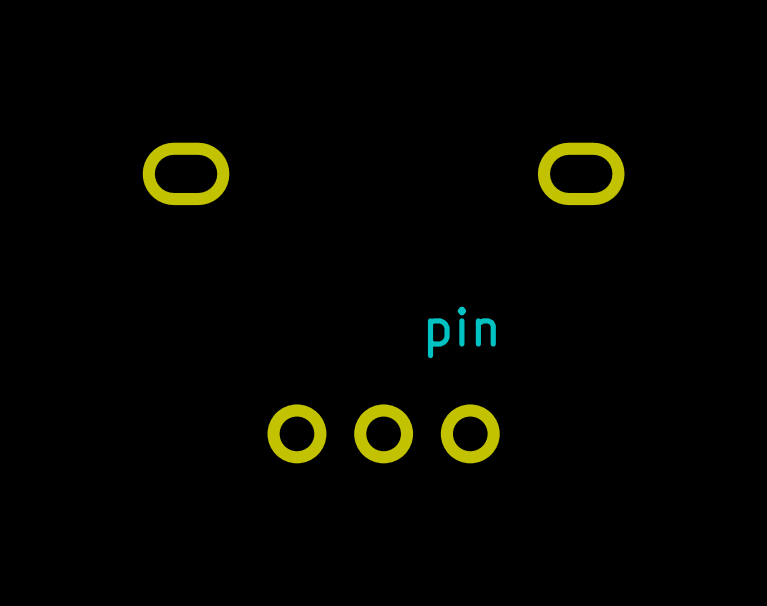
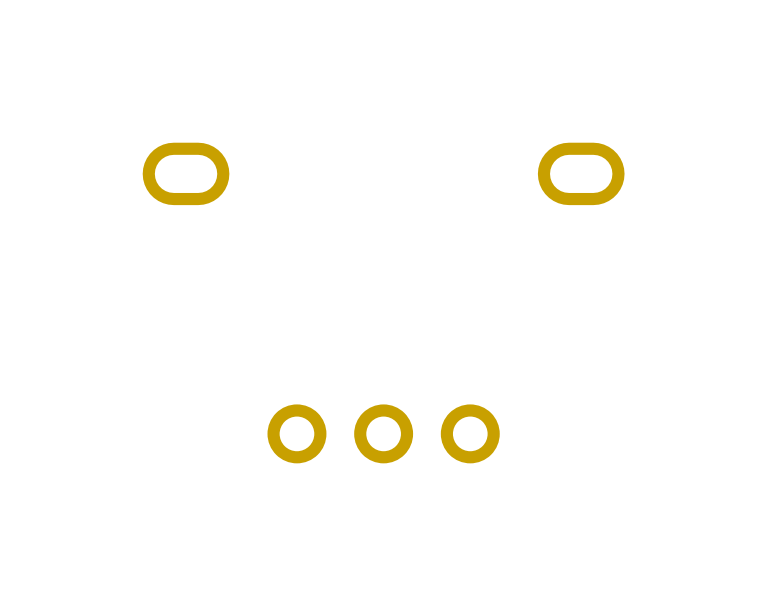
text: pin (461, 332) -> none

